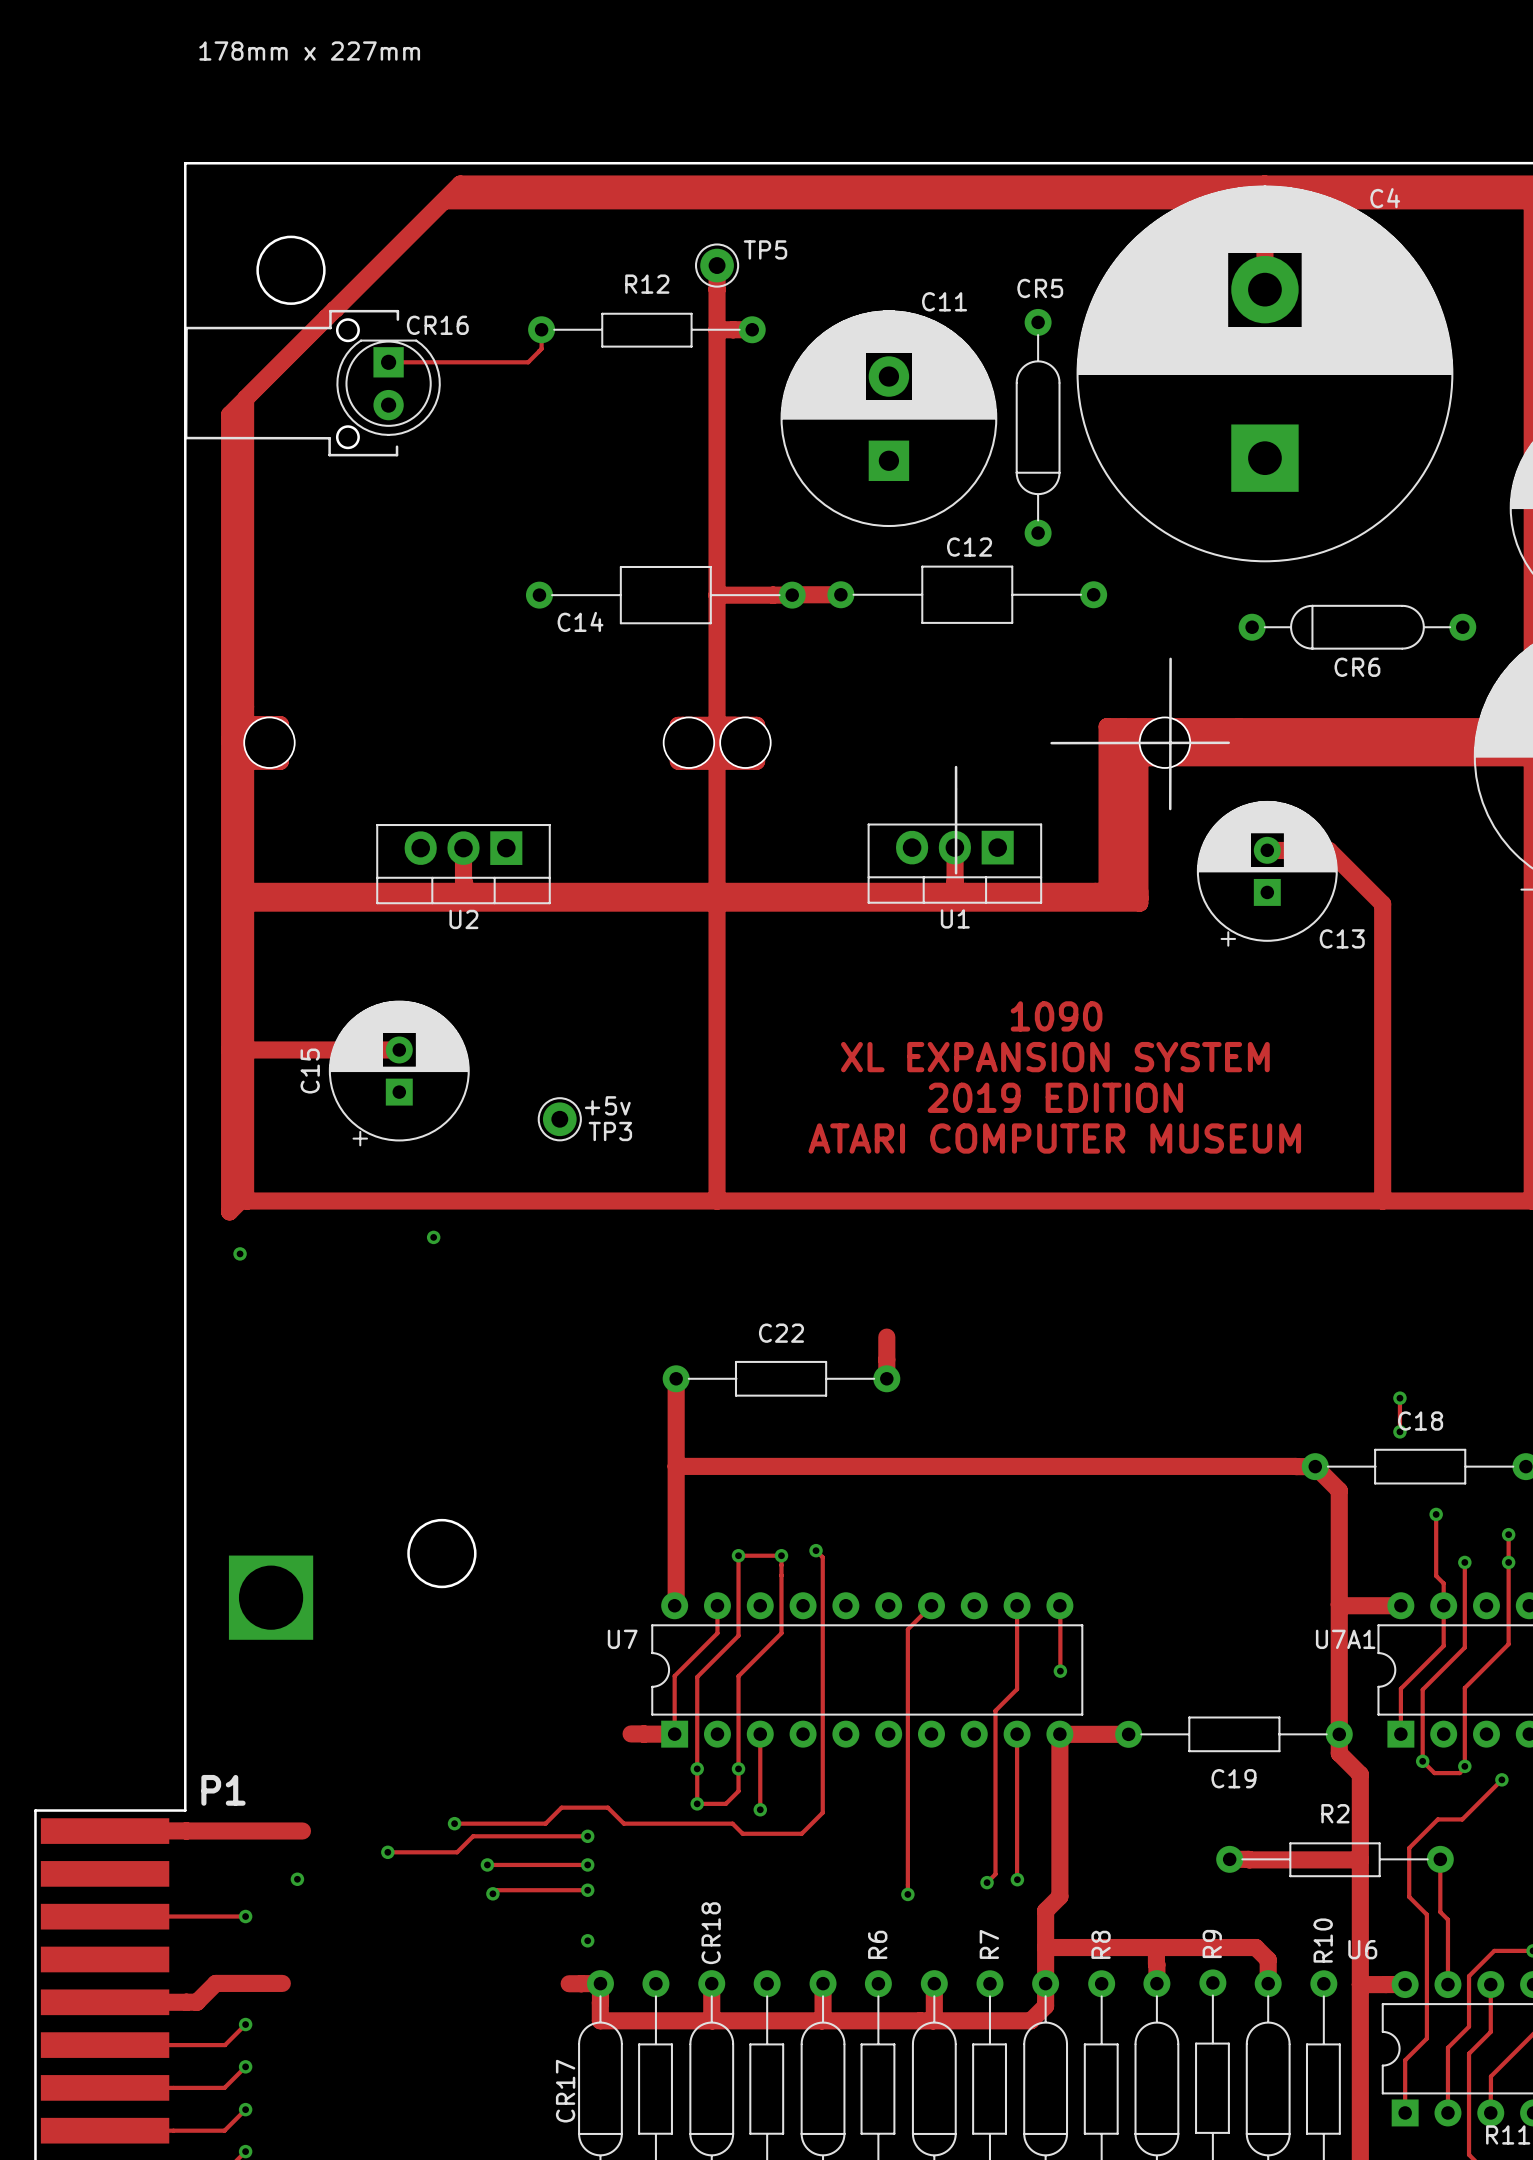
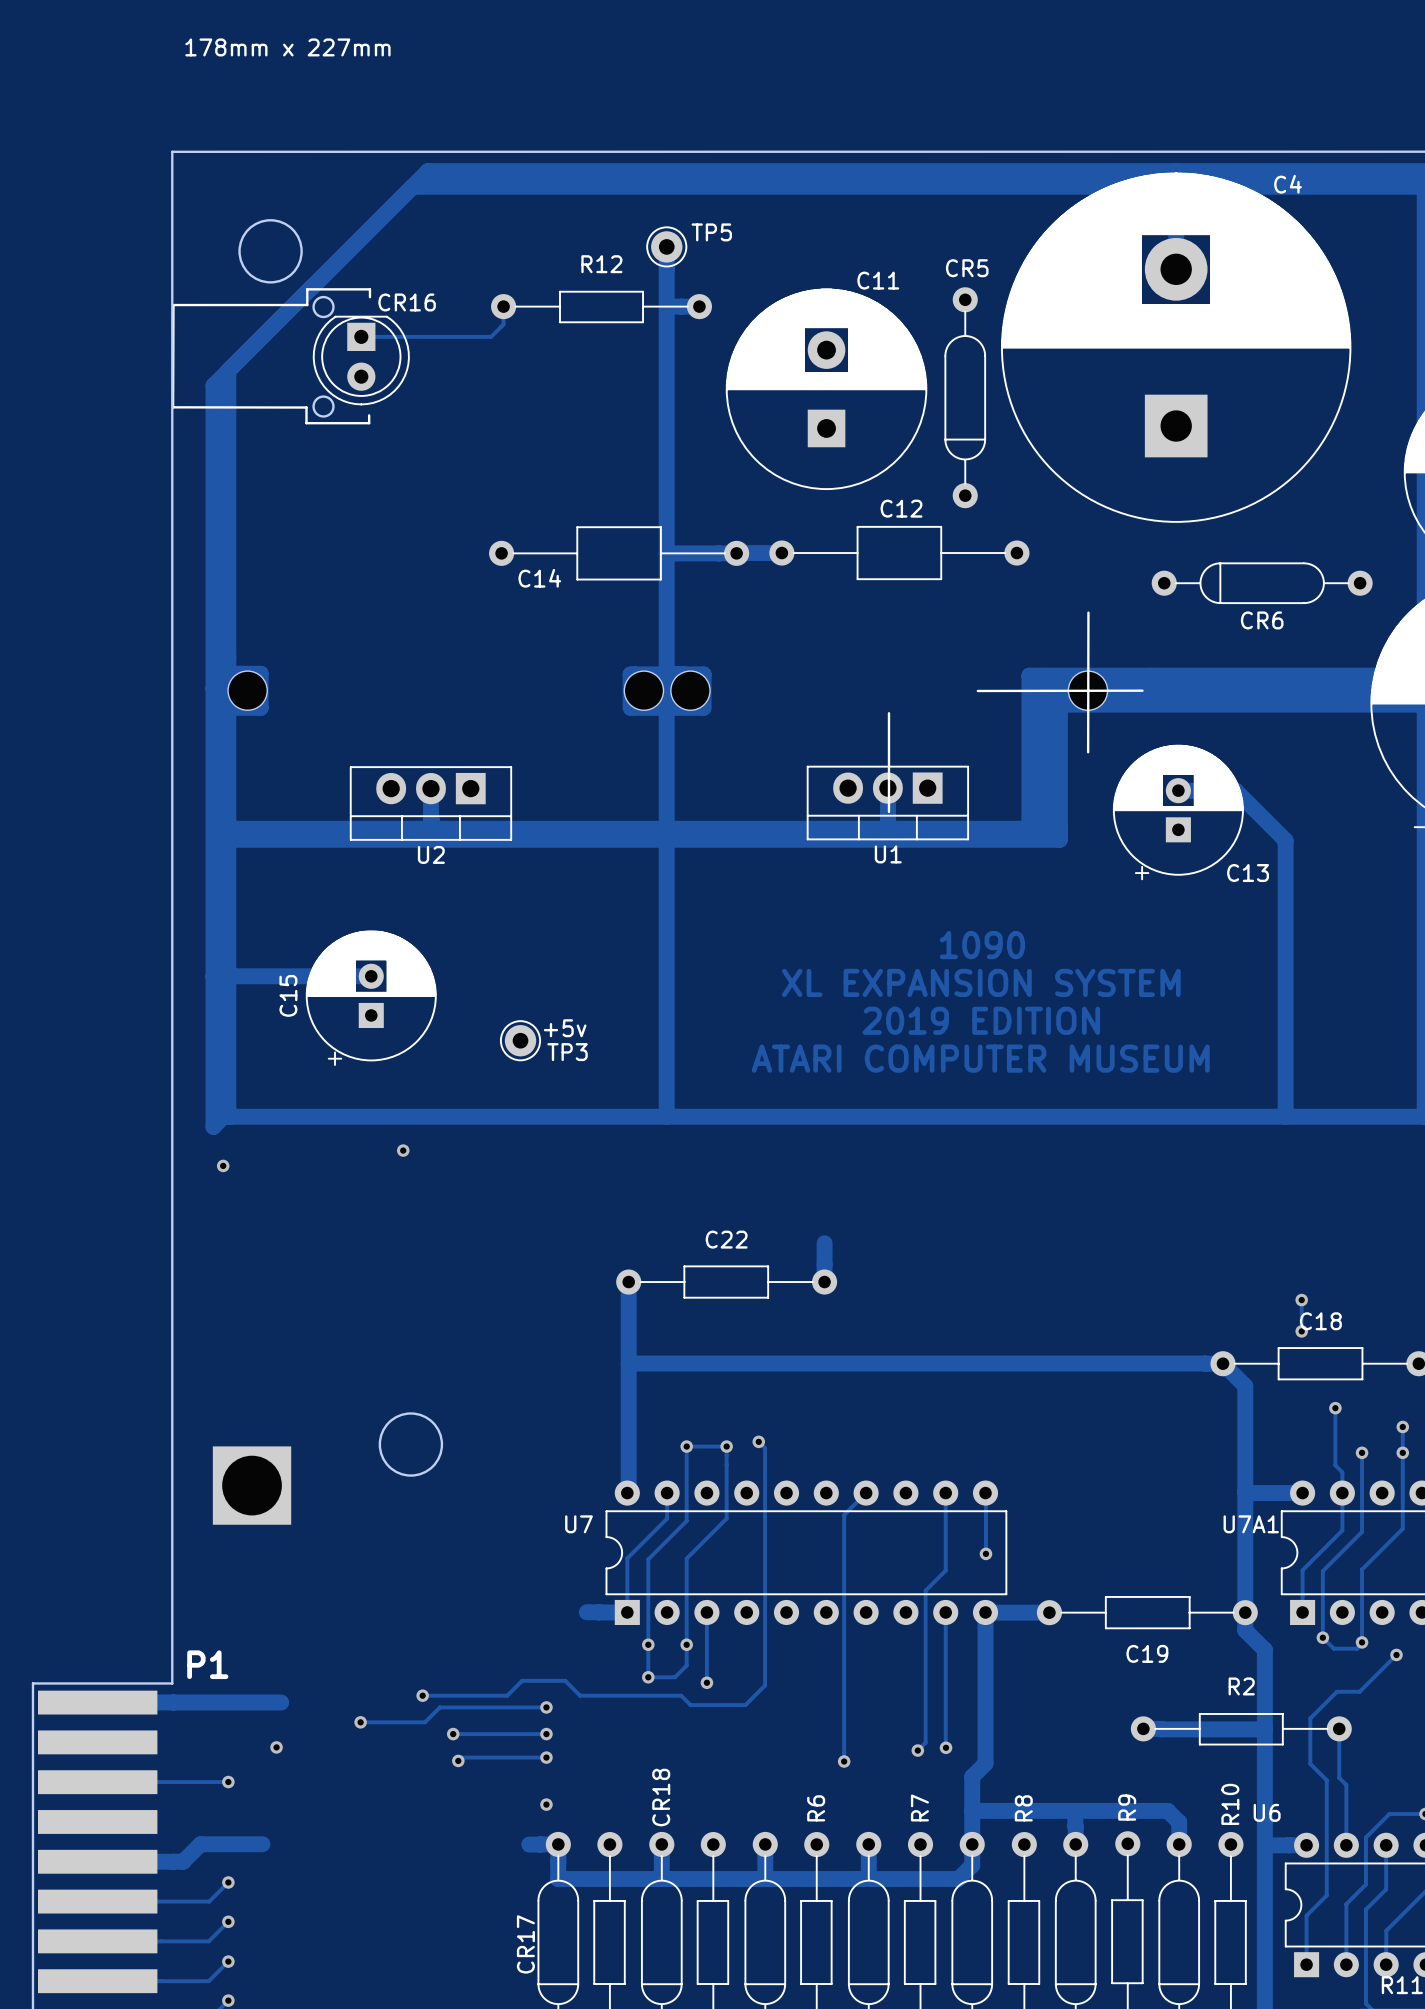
part footprint: [244, 717, 295, 768] -> [228, 671, 268, 711]
part footprint: [663, 717, 715, 768] -> [624, 671, 664, 711]
part footprint: [720, 717, 771, 768] -> [670, 671, 711, 711]
part footprint: [1139, 717, 1191, 768] -> [1068, 671, 1108, 711]

